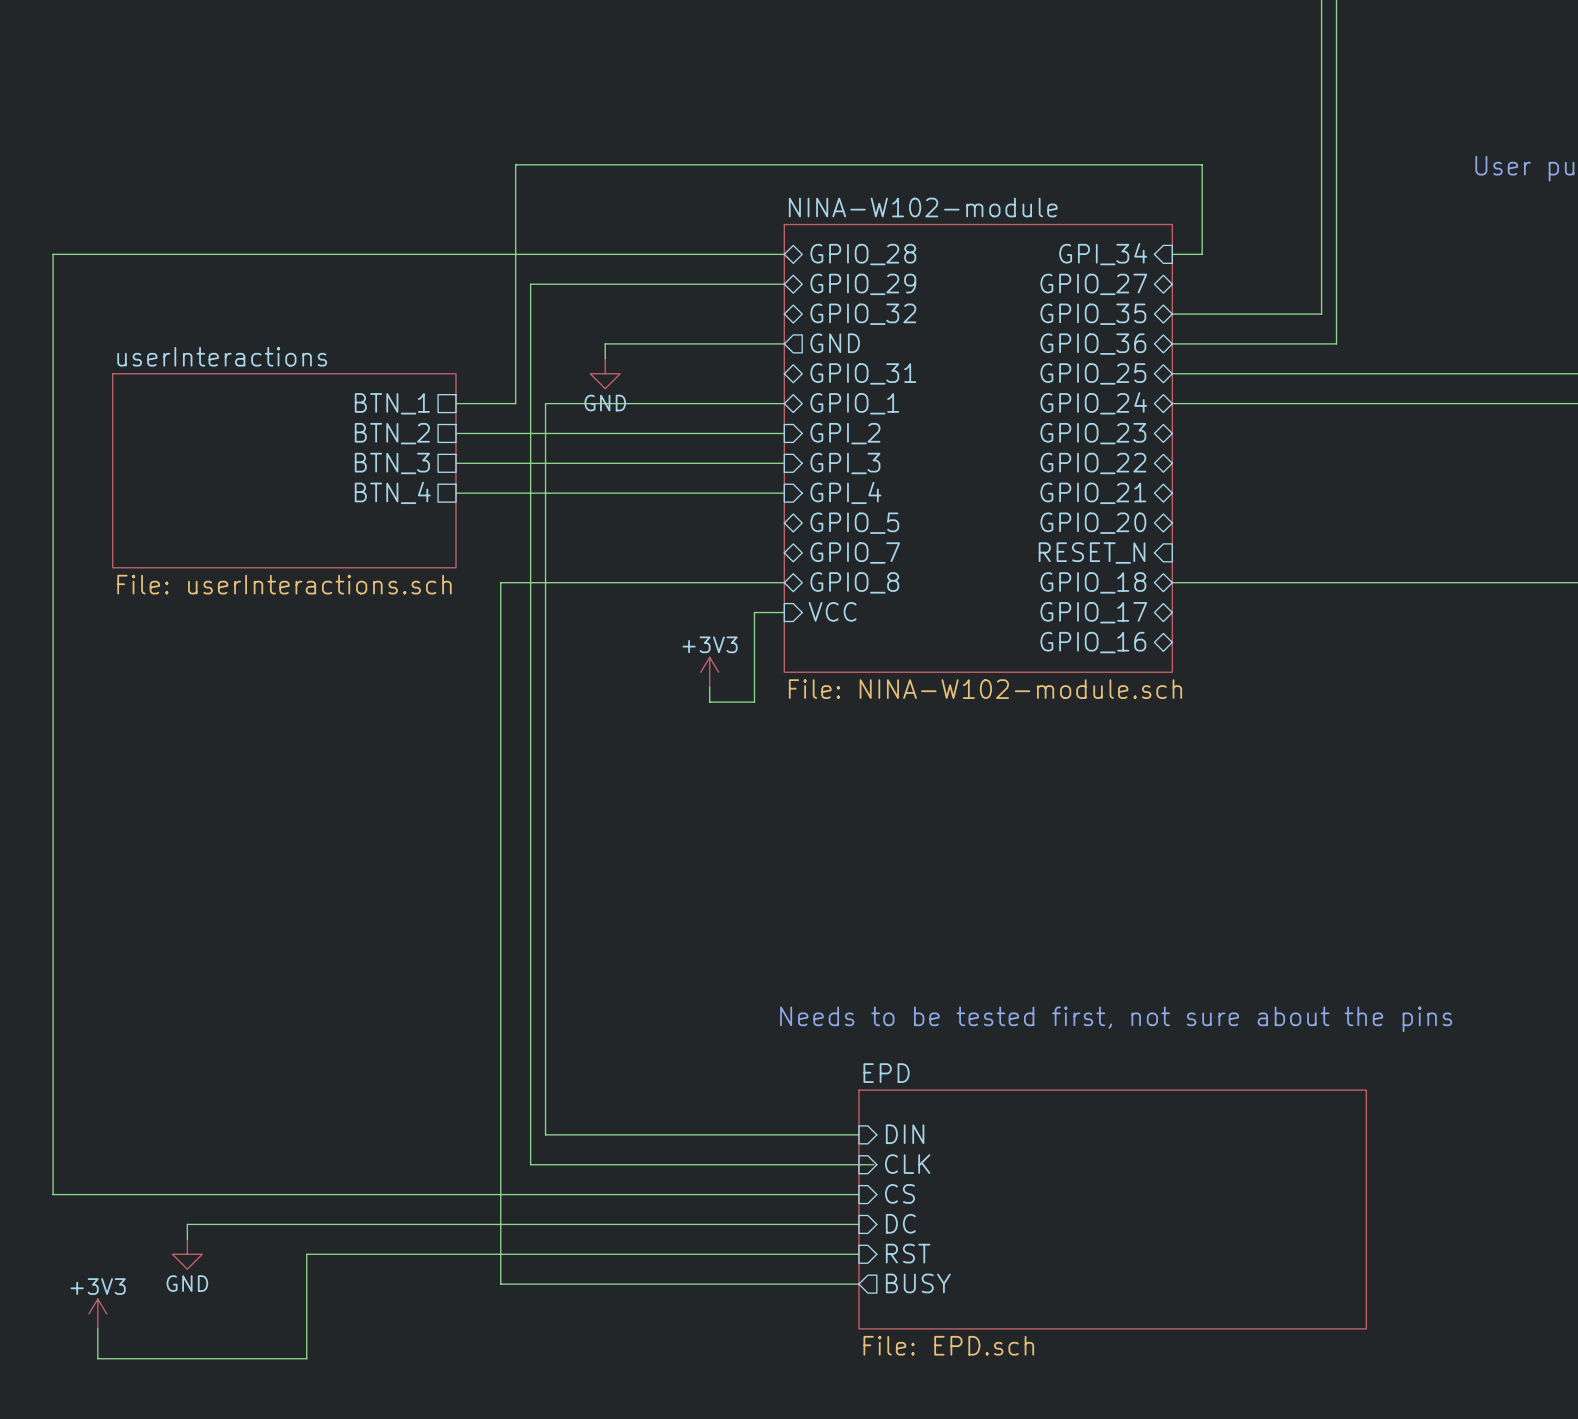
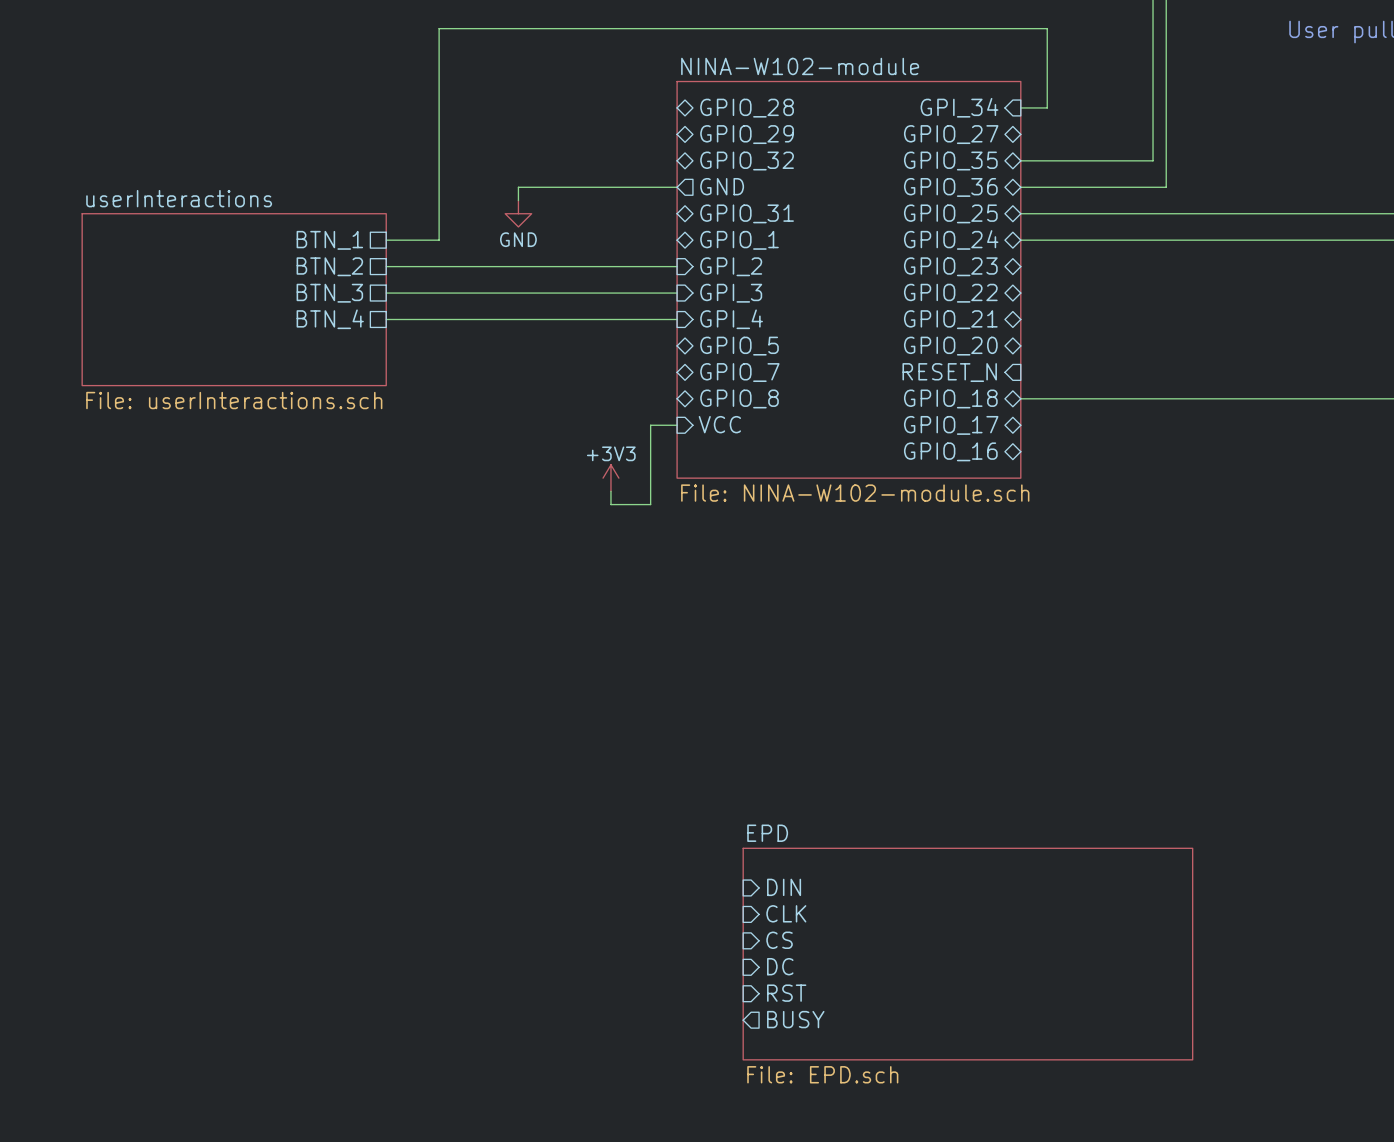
wire: (784, 254) (53, 254) (53, 1194) (858, 1194) -> none
wire: (784, 284) (530, 284) (530, 1164) (873, 1164) -> none
wire: (784, 403) (545, 403) (545, 1134) (858, 1134) -> none
wire: (784, 582) (500, 582) (500, 1284) (858, 1284) -> none
text: Needs to be tested first, not sure about the pins (1116, 1019) -> none
wire: (858, 1224) (187, 1224) (187, 1239) -> none
power symbol: GND (187, 1254) -> none
wire: (858, 1254) (306, 1254) (306, 1358) (97, 1358) (97, 1328) -> none
power symbol: +3V3 (97, 1313) -> none

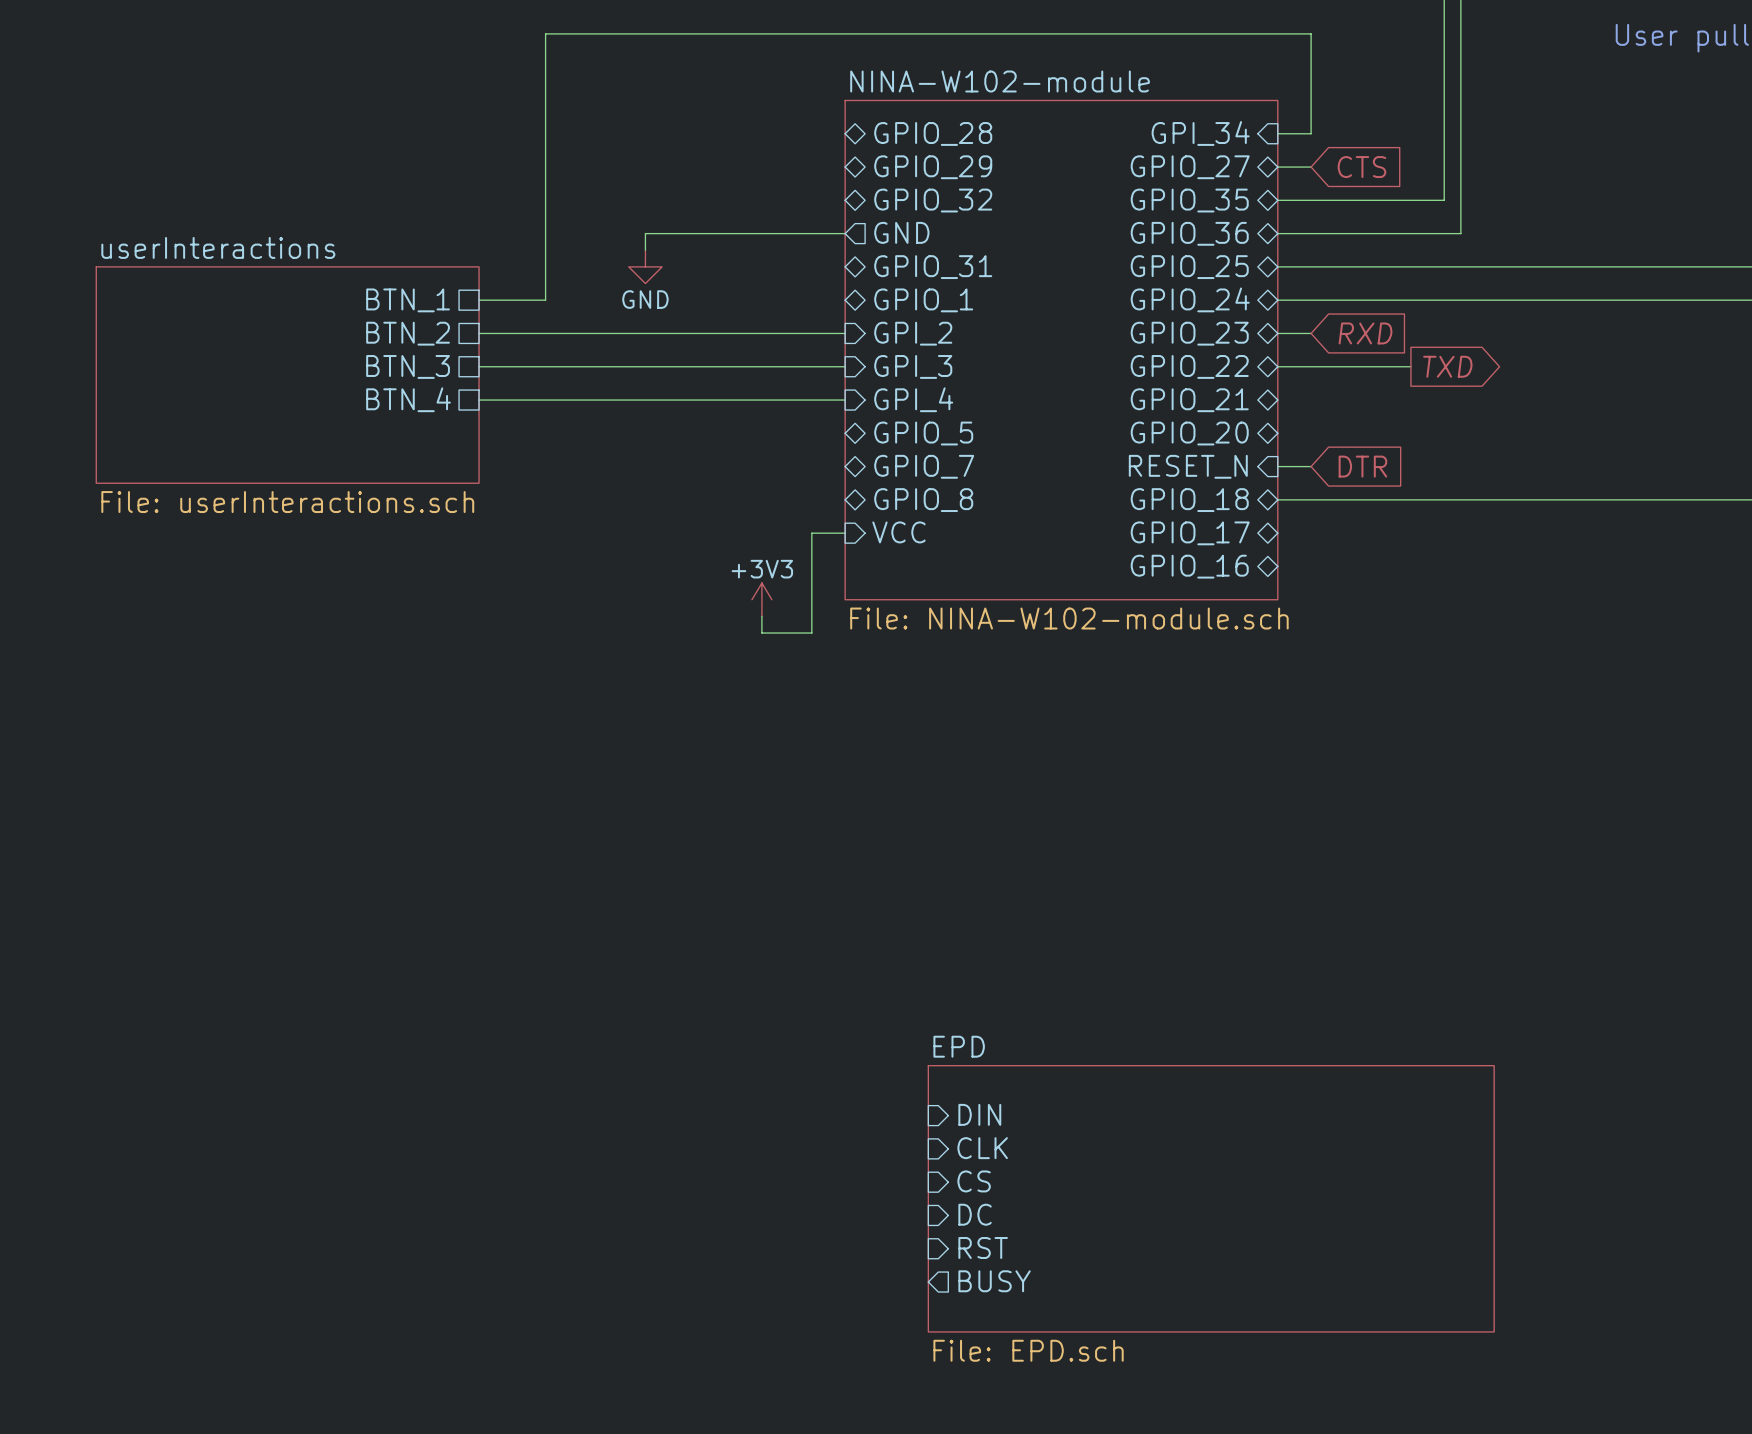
wire: none -> (1277, 167) (1311, 167)
global label: none -> CTS (1361, 167)
wire: none -> (1277, 333) (1311, 333)
global label: none -> RXD (1365, 333)
wire: none -> (1277, 366) (1410, 366)
global label: none -> TXD (1447, 366)
wire: none -> (1277, 466) (1311, 466)
global label: none -> DTR (1362, 466)

